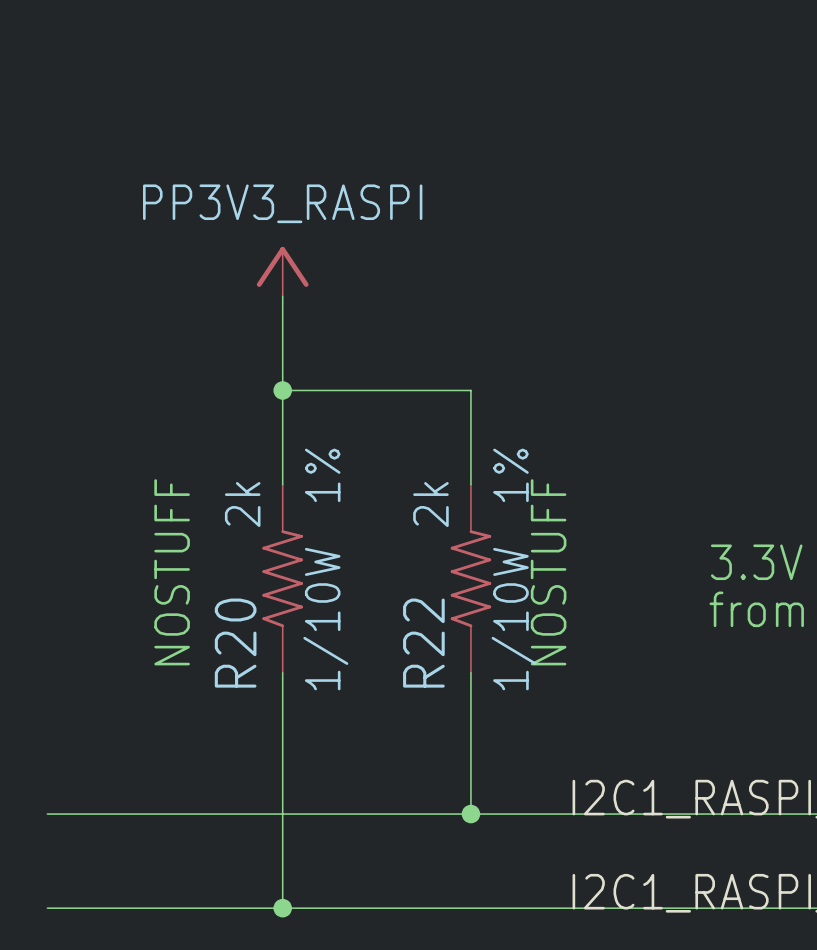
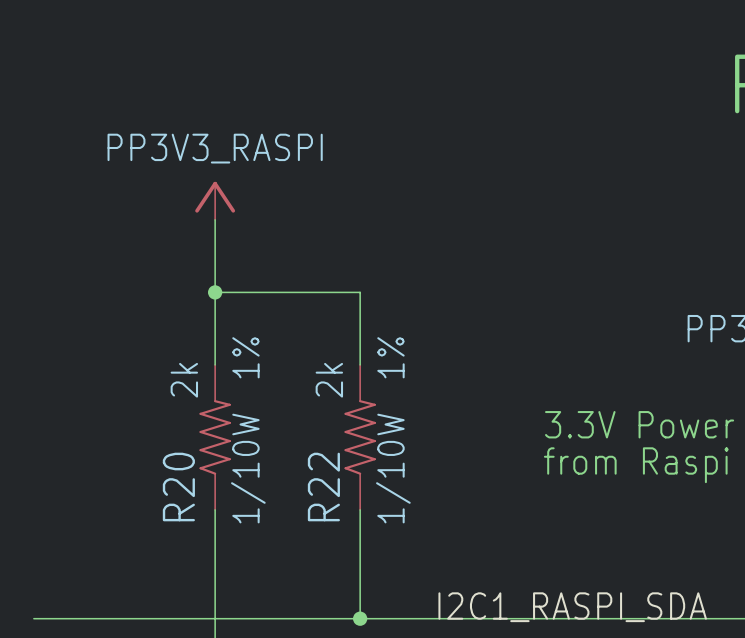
text: NOSTUFF (172, 572) -> none
text: NOSTUFF (548, 572) -> none

